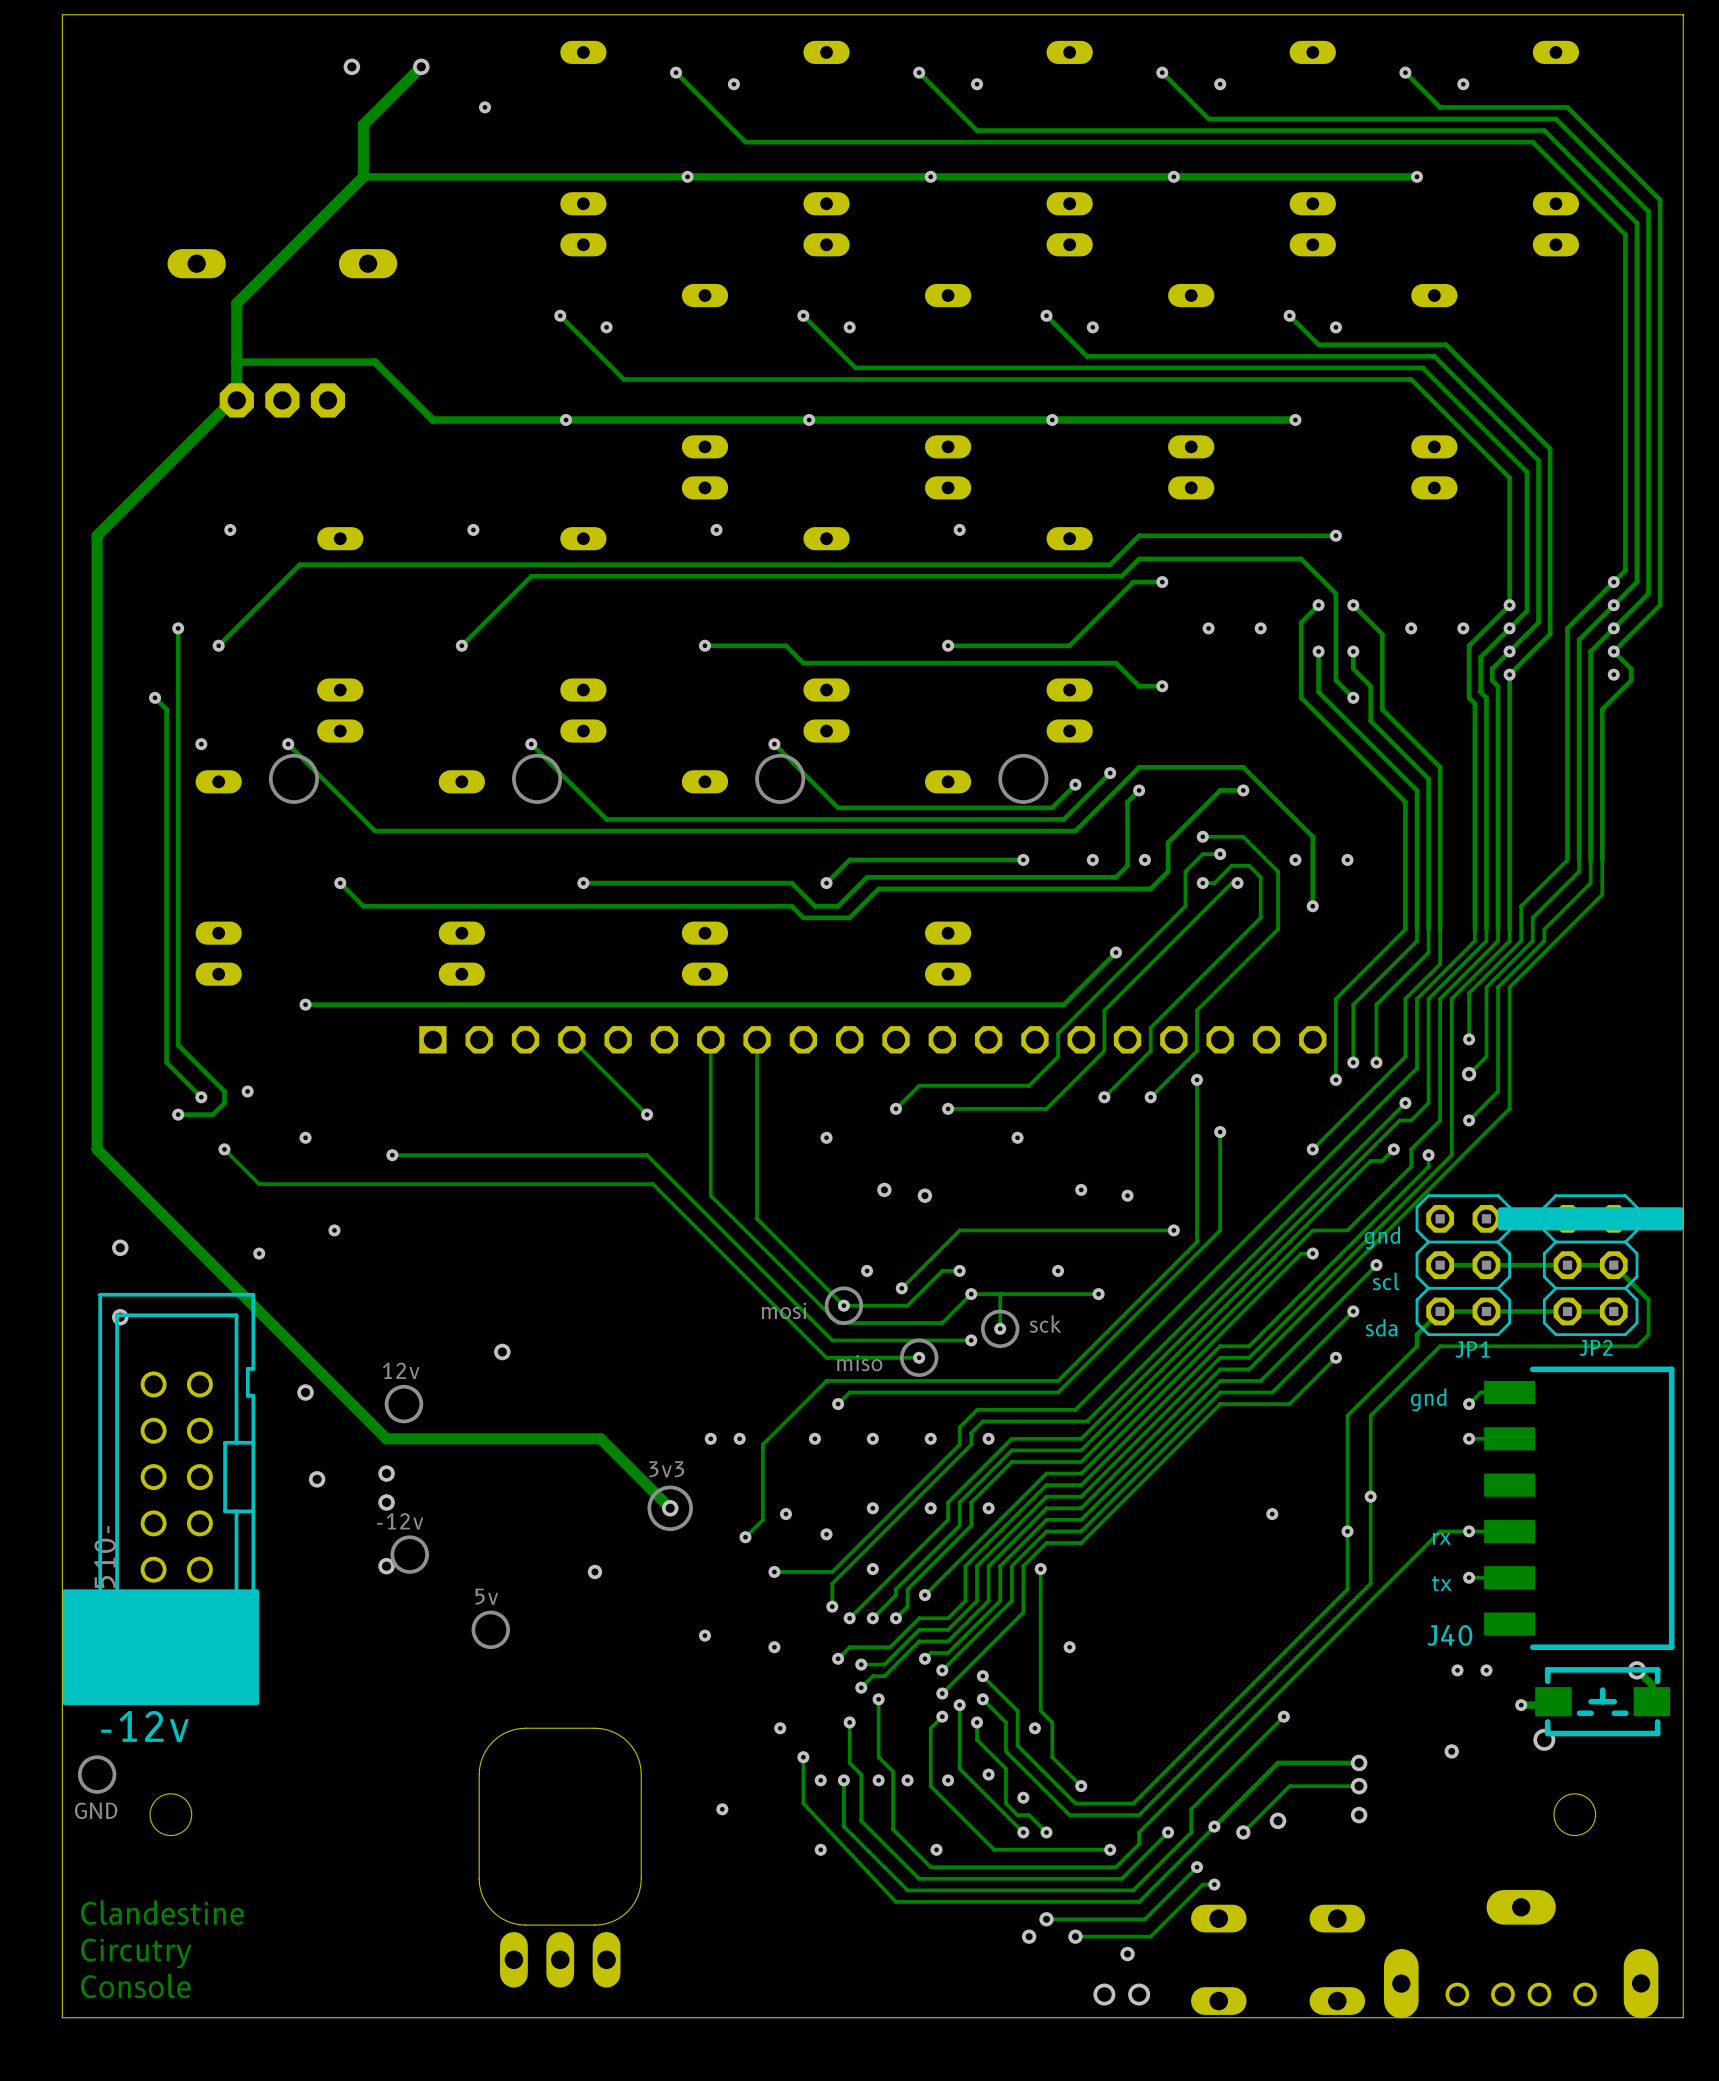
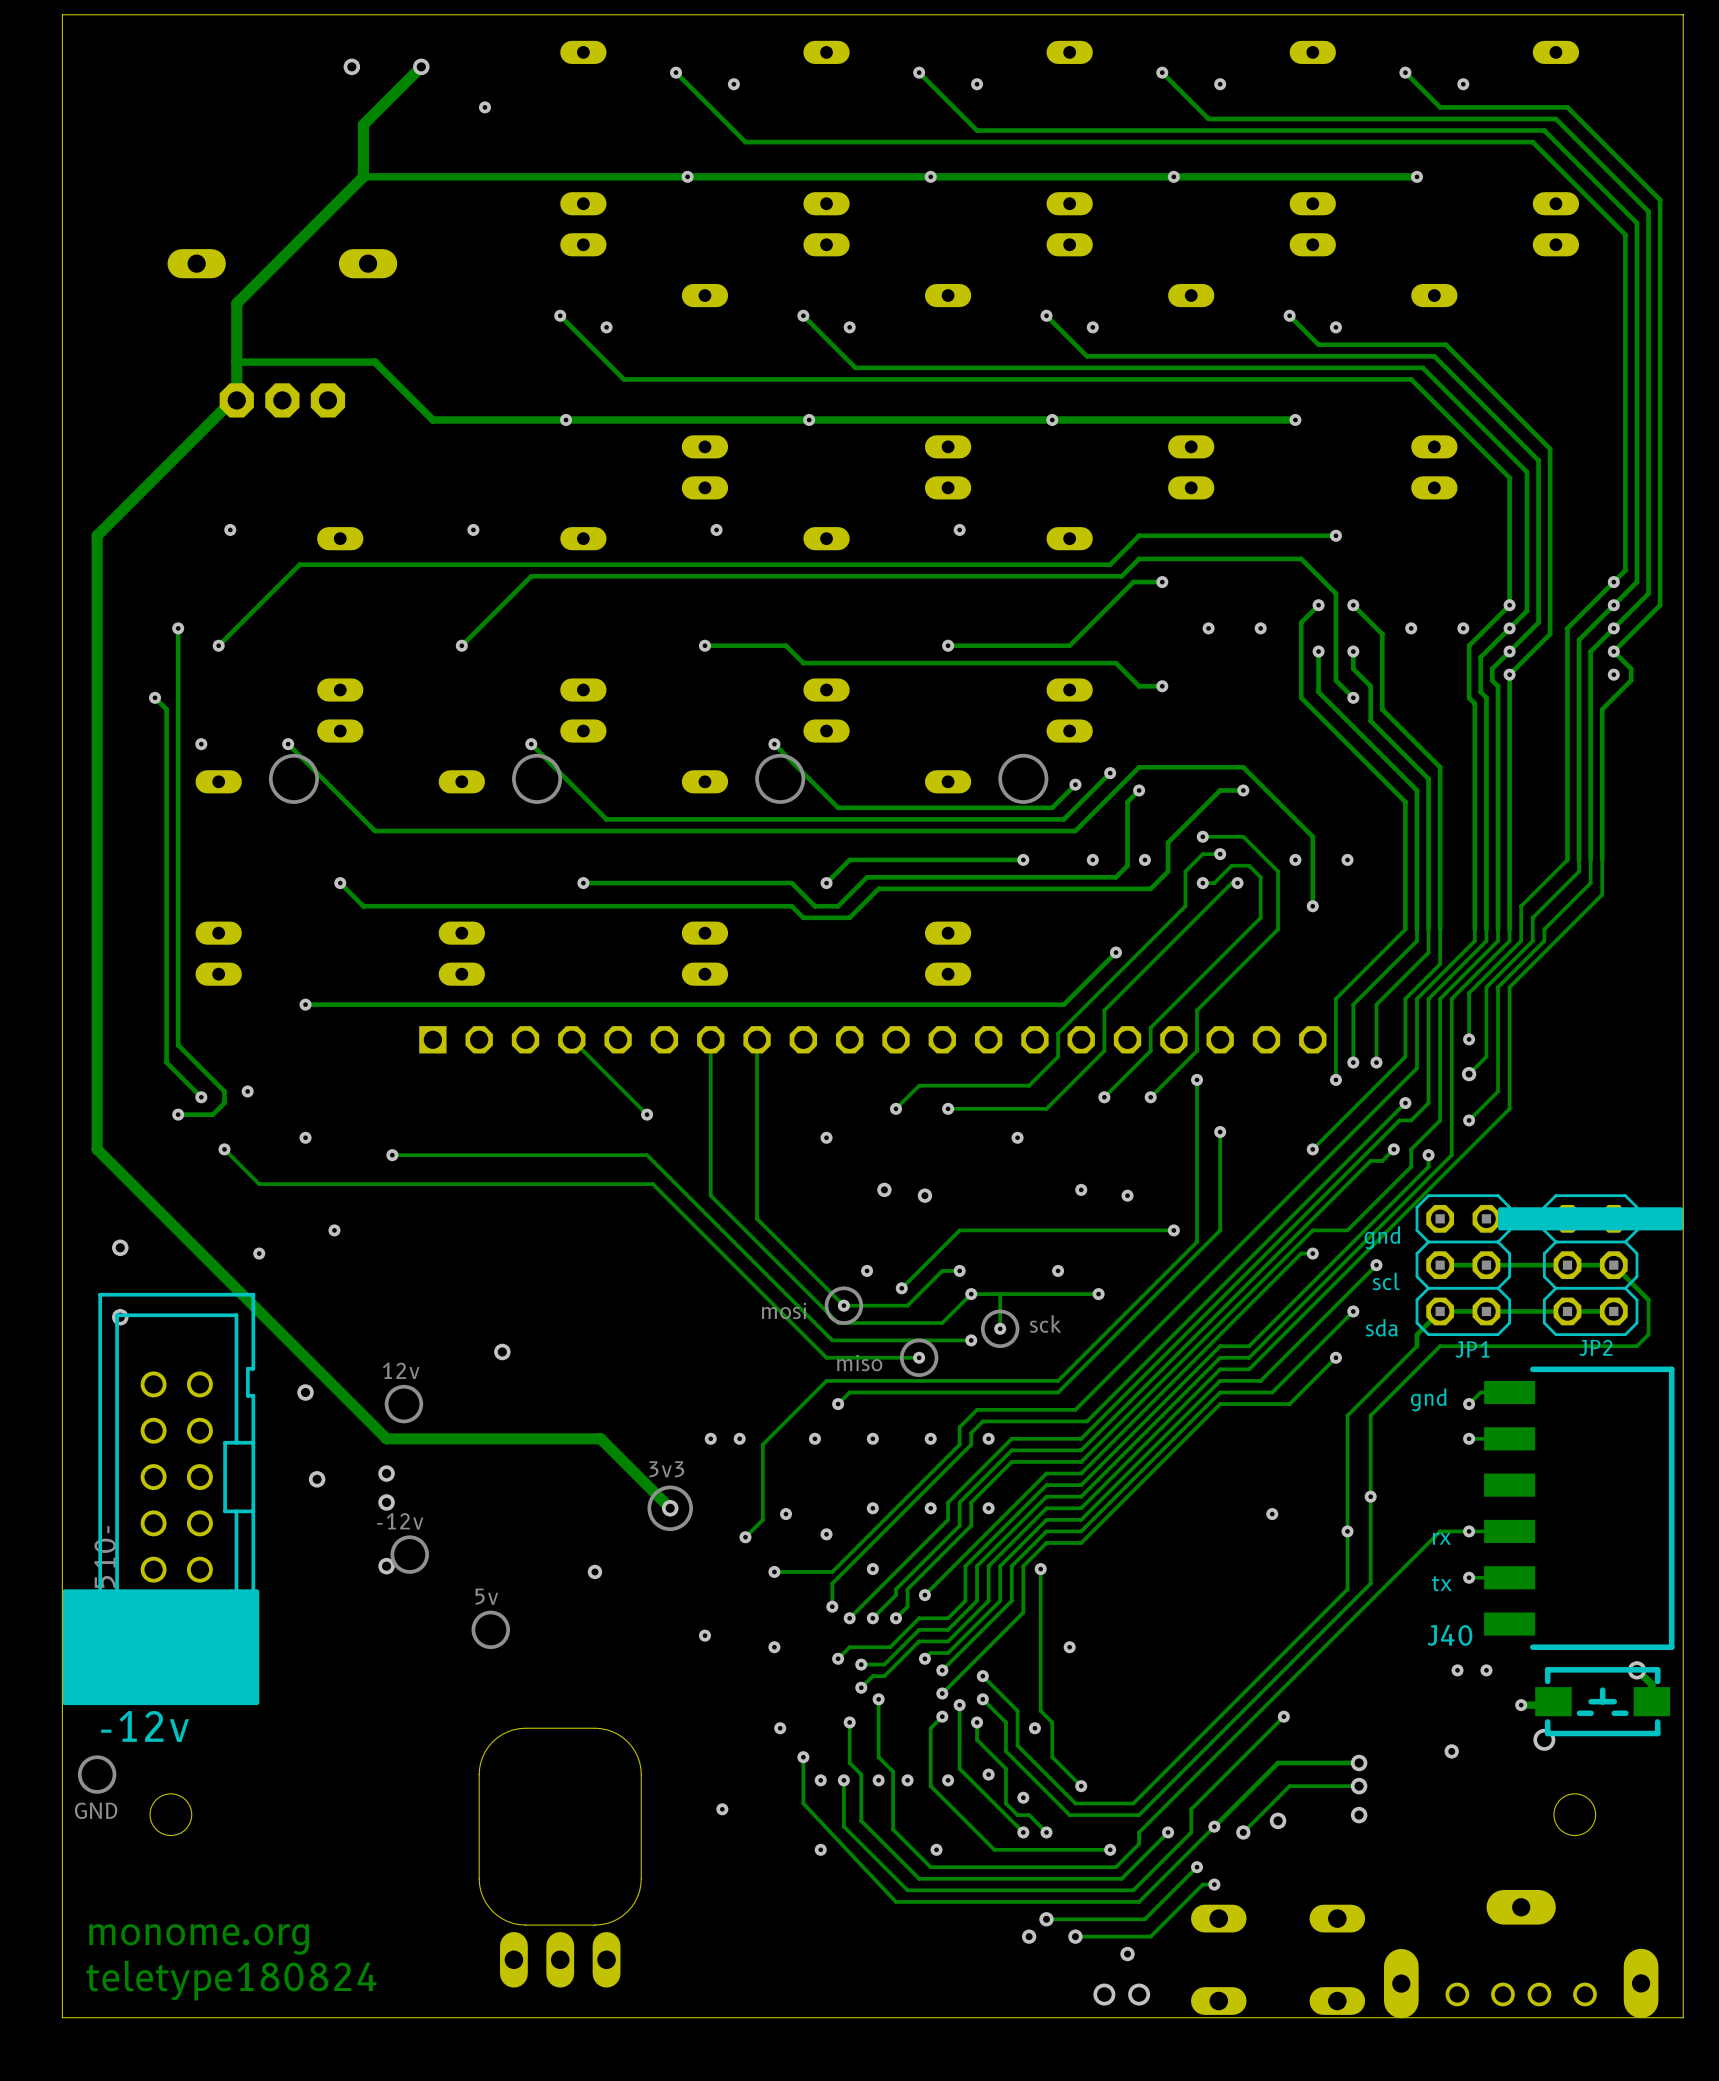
text: Clandestine (162, 1912) -> none
text: none -> monome.org (199, 1939)
text: Circutry (136, 1953) -> none
text: Console (135, 1985) -> teletype180824 (231, 1980)

